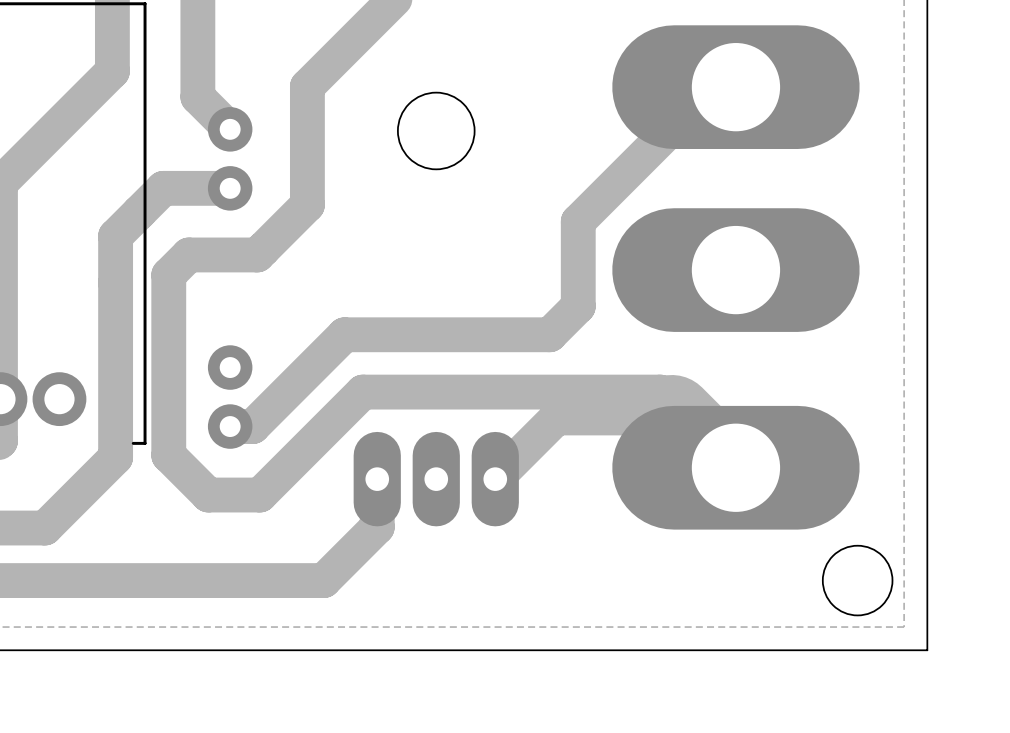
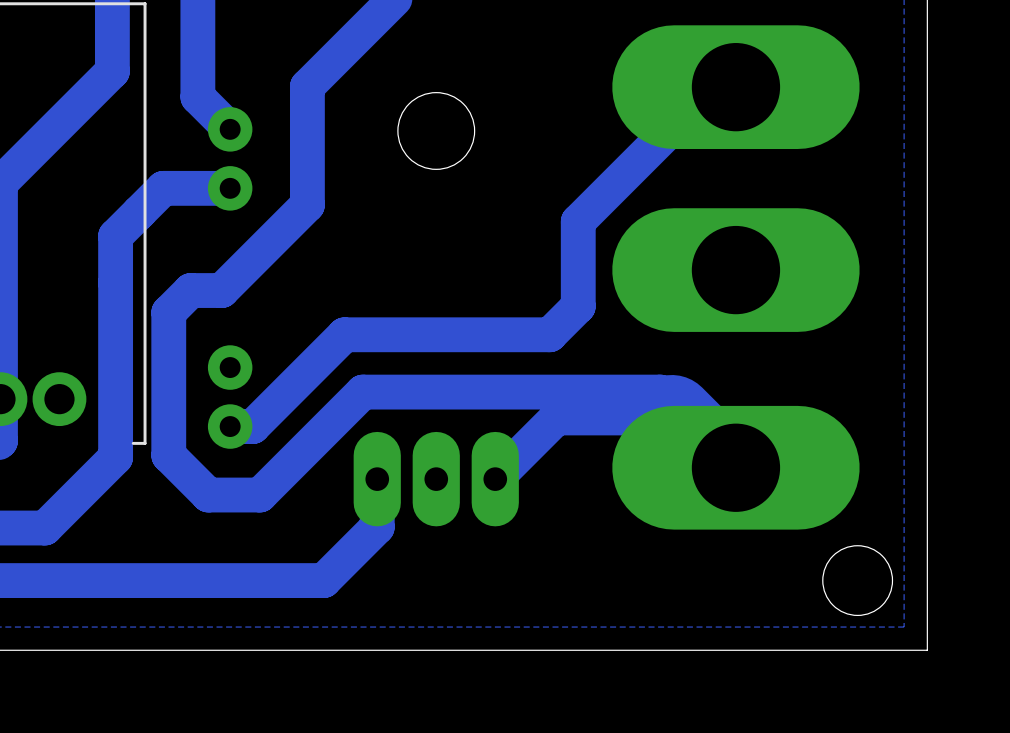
track: (257, 254) (188, 254) (168, 275) (168, 312) -> (257, 254) (221, 290) (190, 290) (168, 312)

